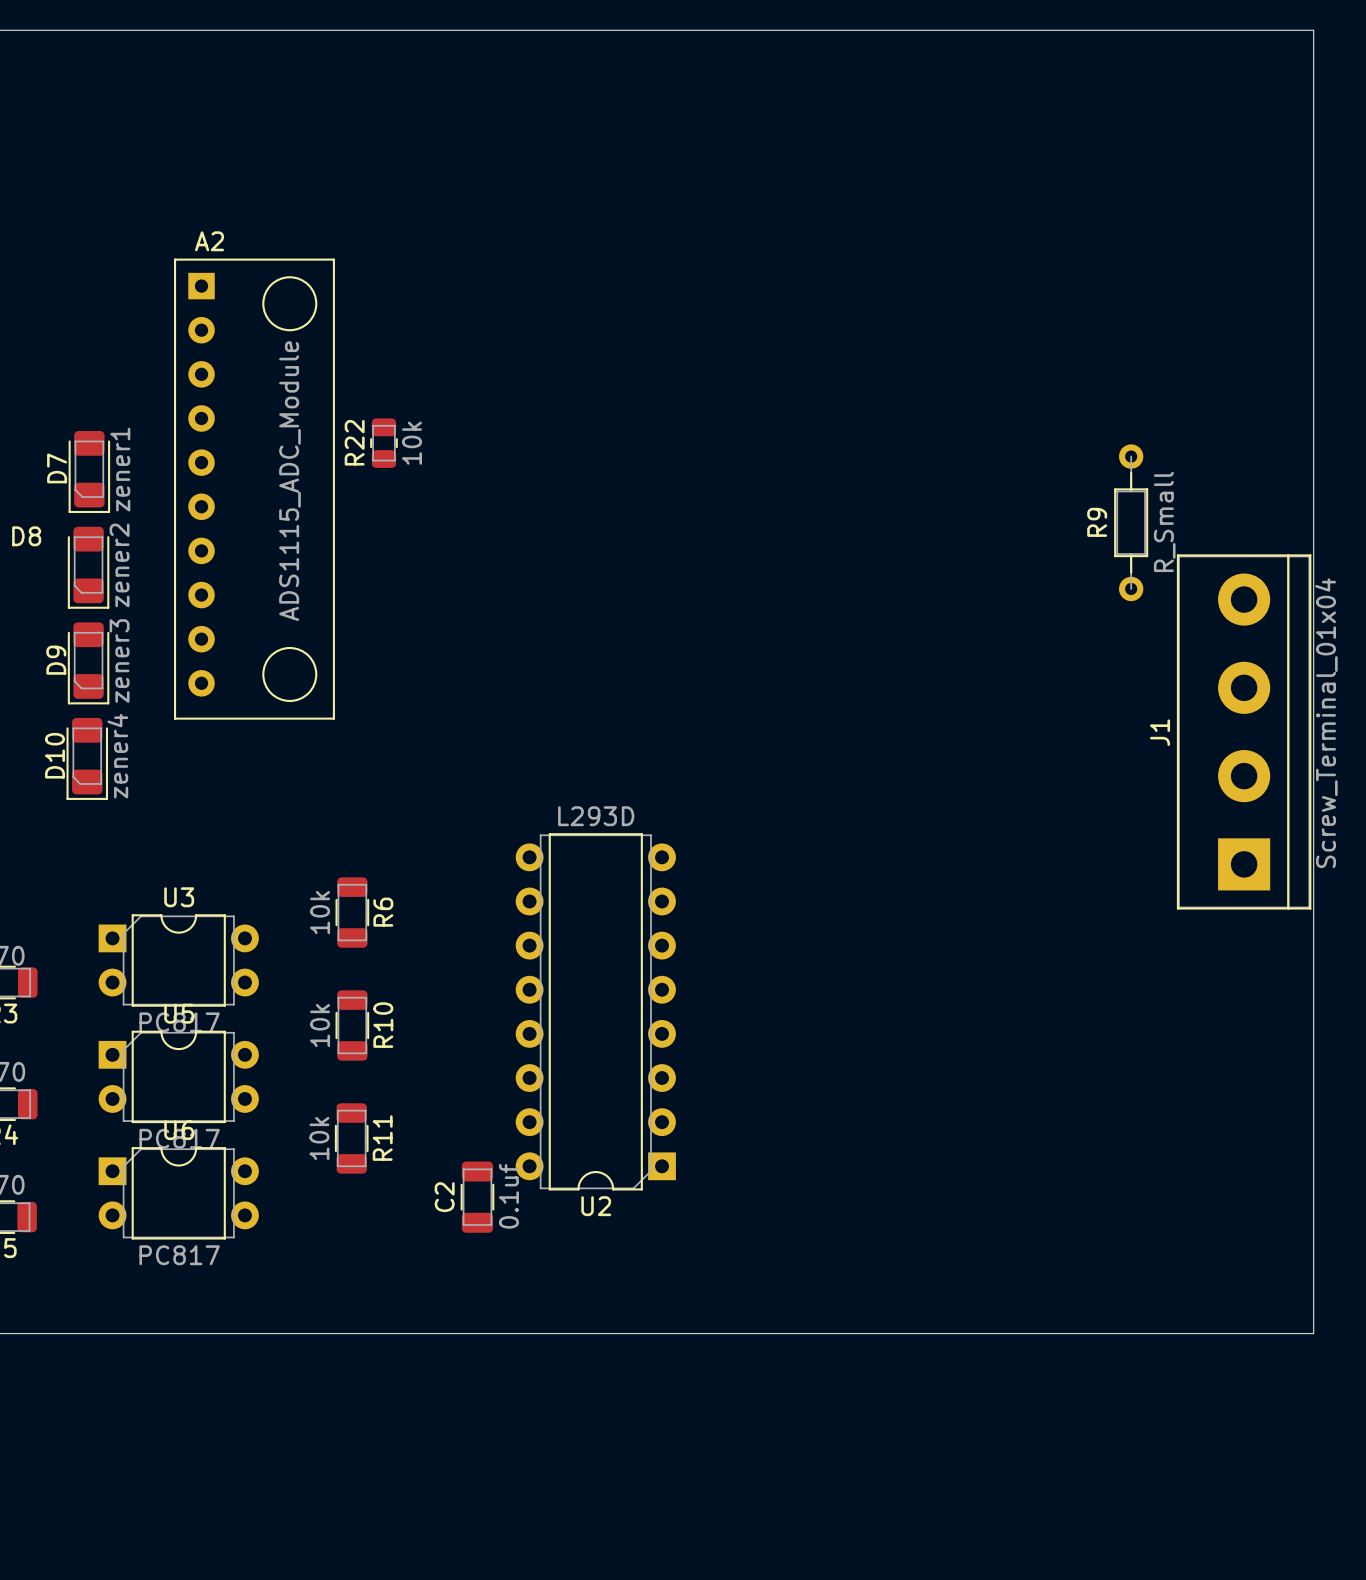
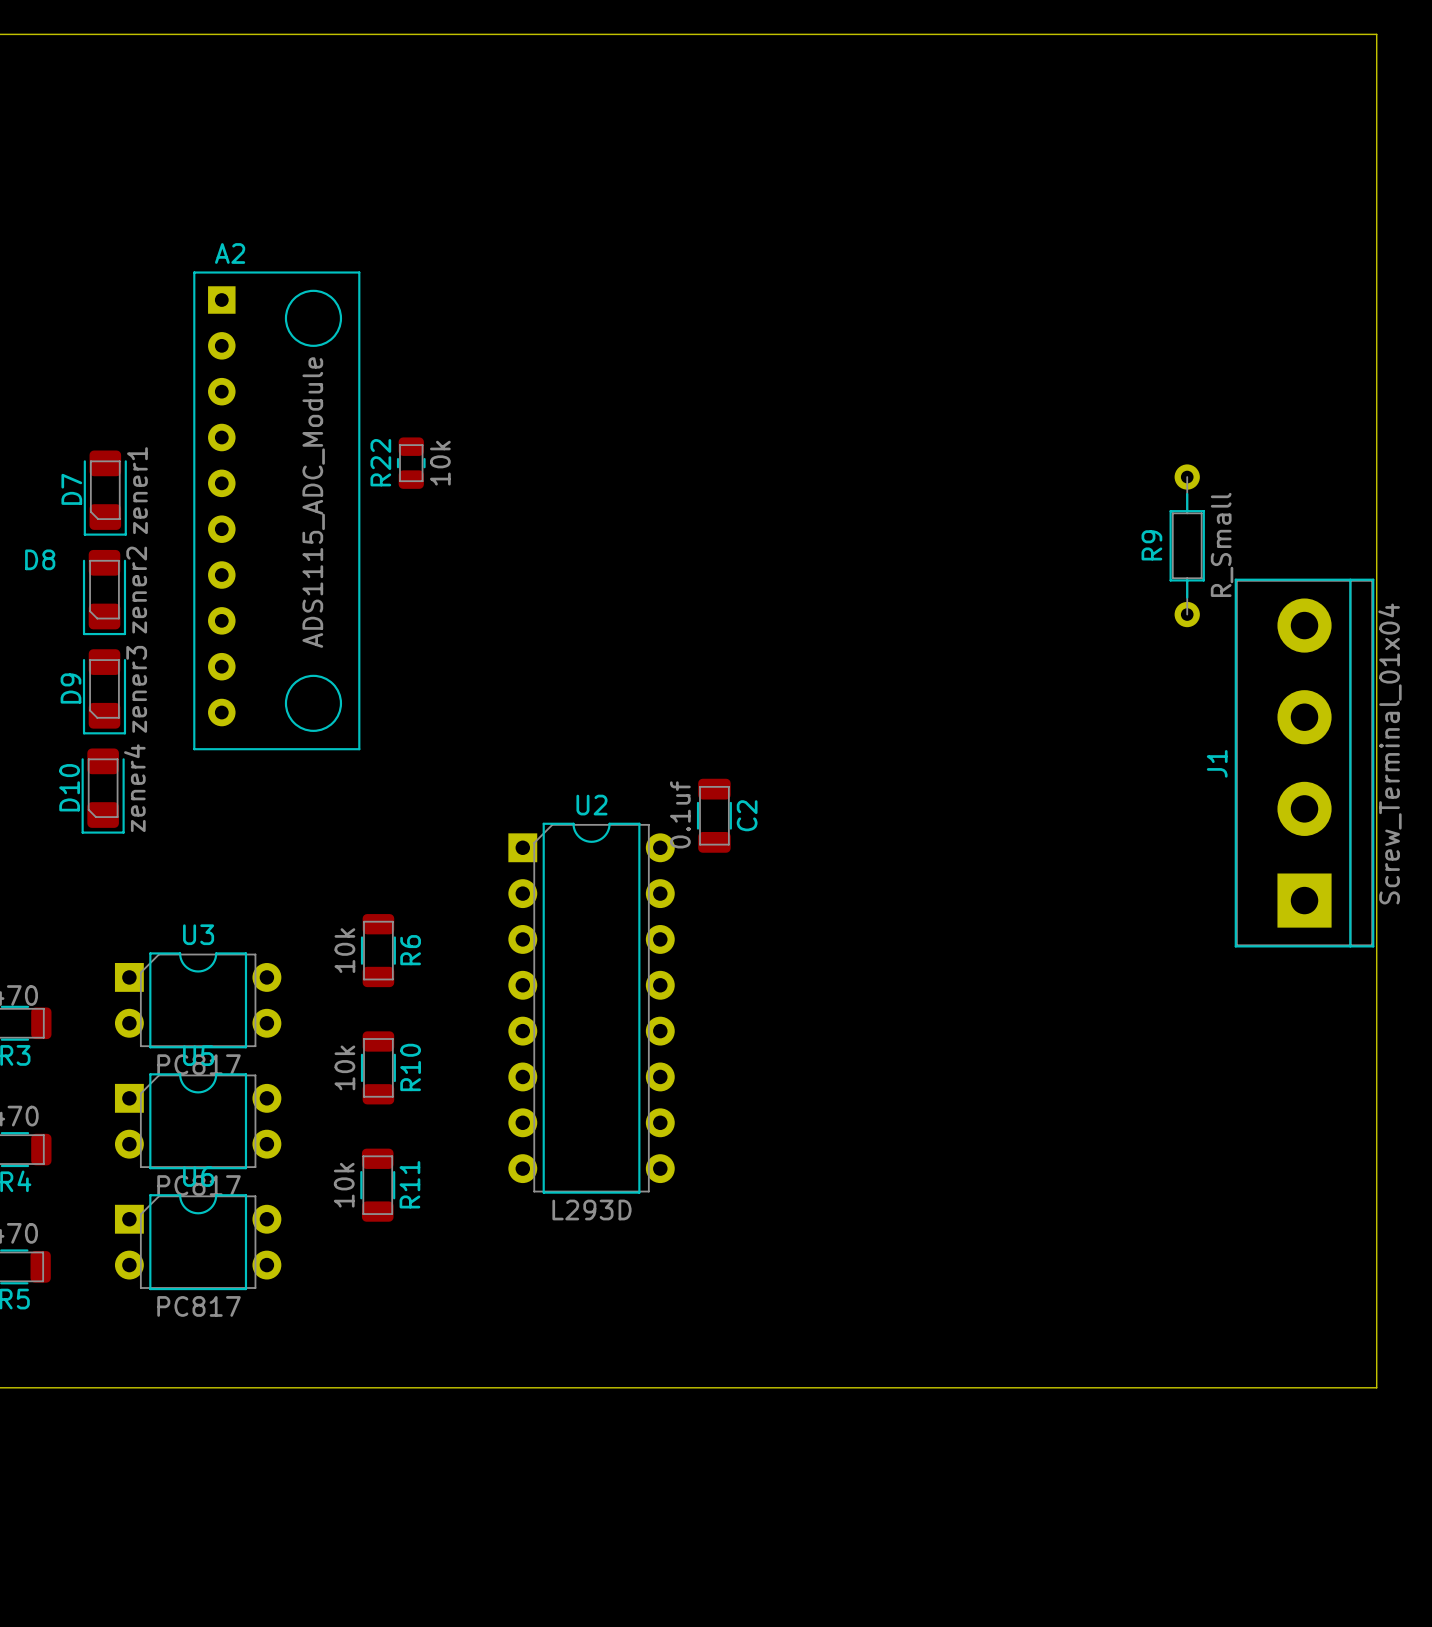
U2 rotation: 0° (595, 1011) -> 180° (591, 1008)
C2 value position: 0.1uf (508, 1196) -> 0.1uf (680, 814)
C2 name position: C2 (444, 1197) -> C2 (747, 815)
C2 position: (477, 1197) -> (714, 815)

